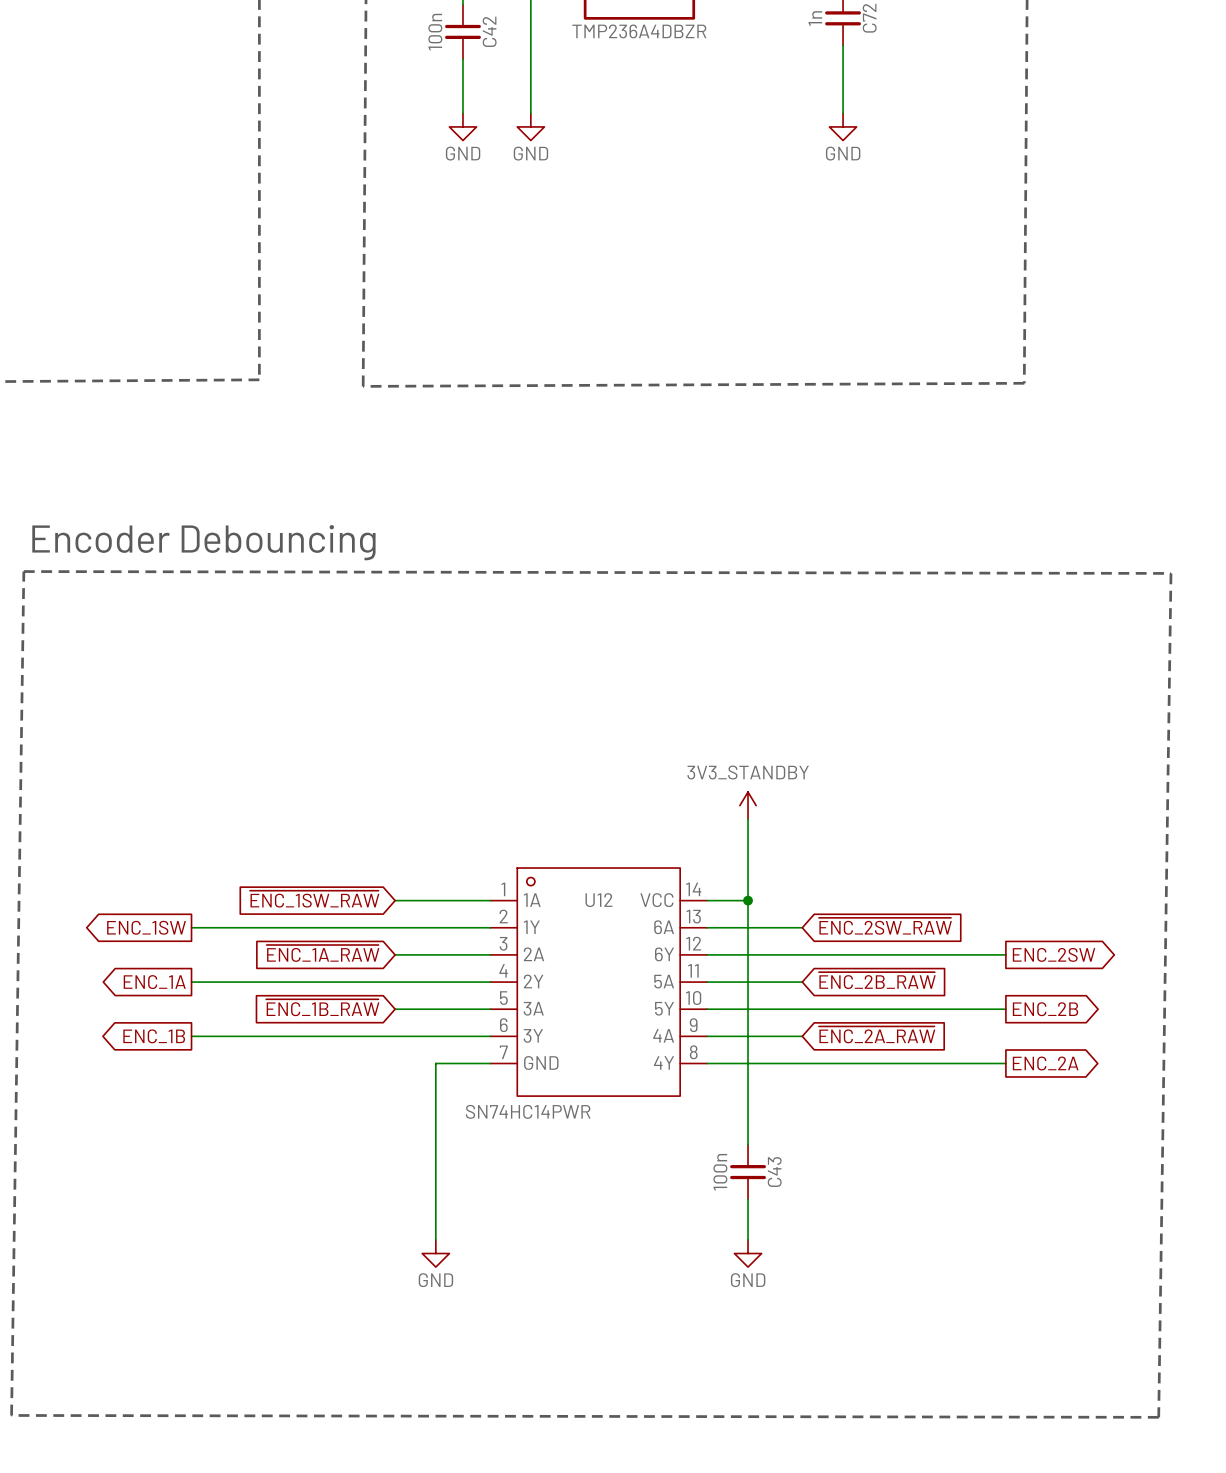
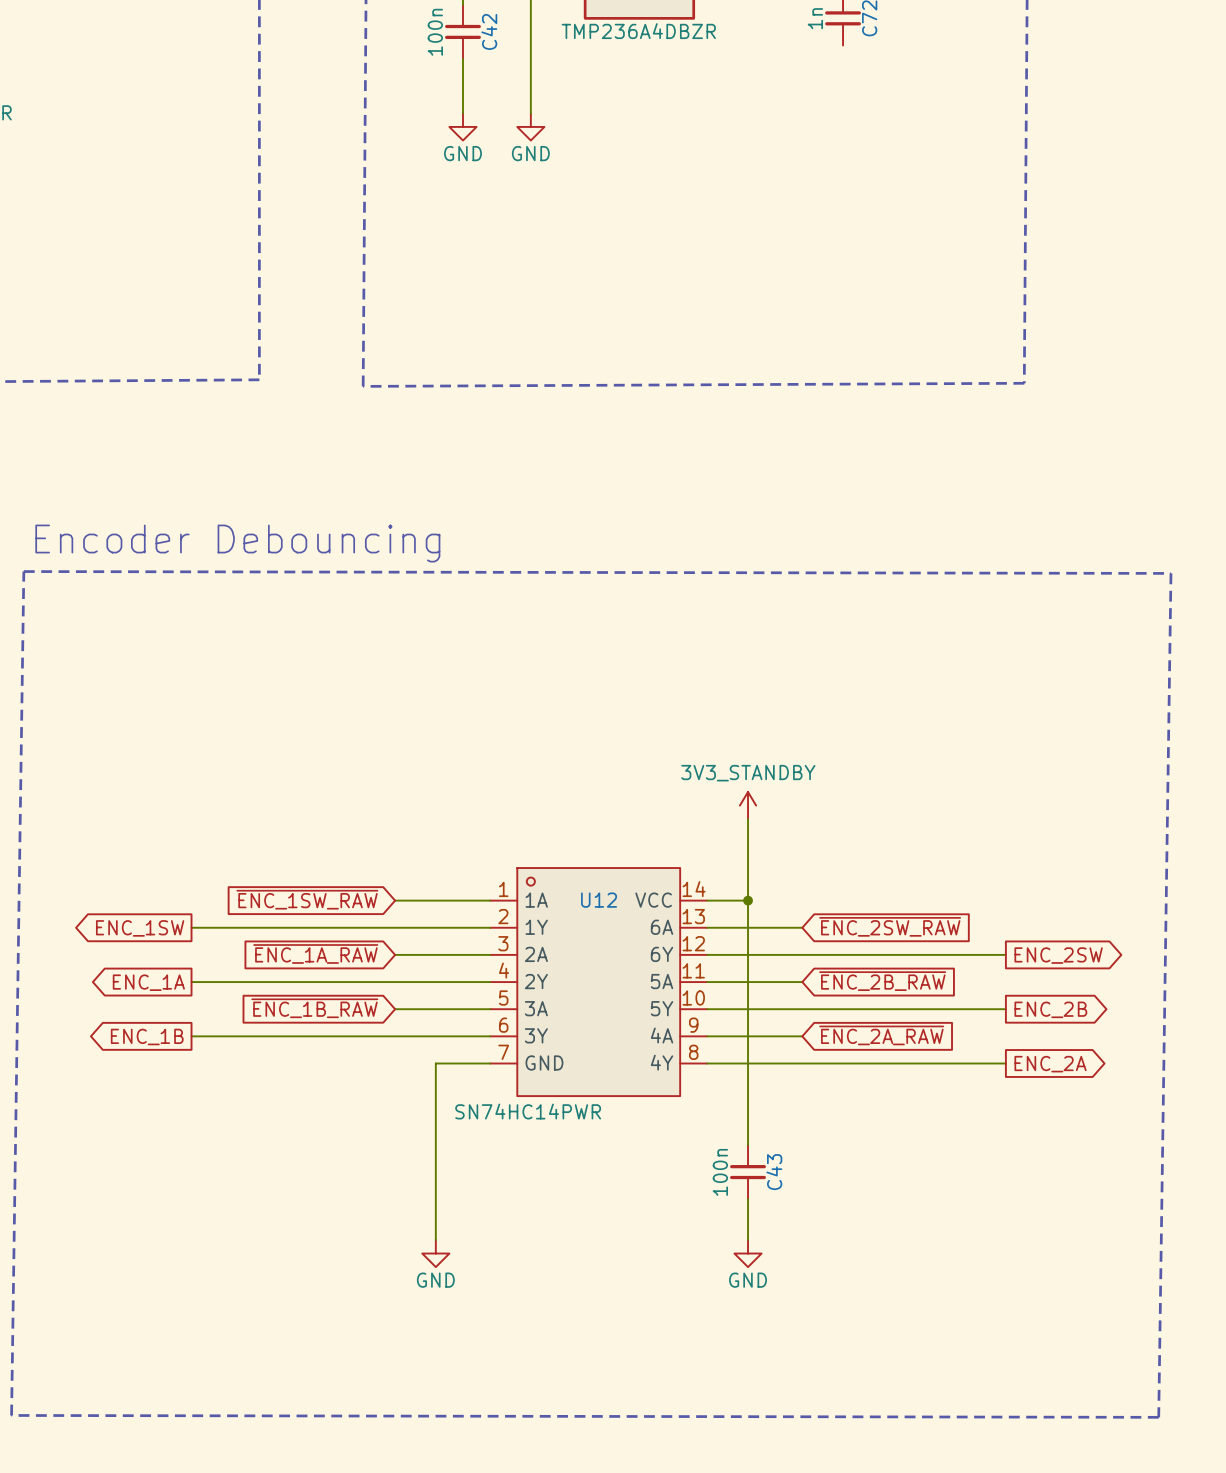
wire: (843, 45) (843, 113) -> none
power symbol: GND (843, 126) -> none

